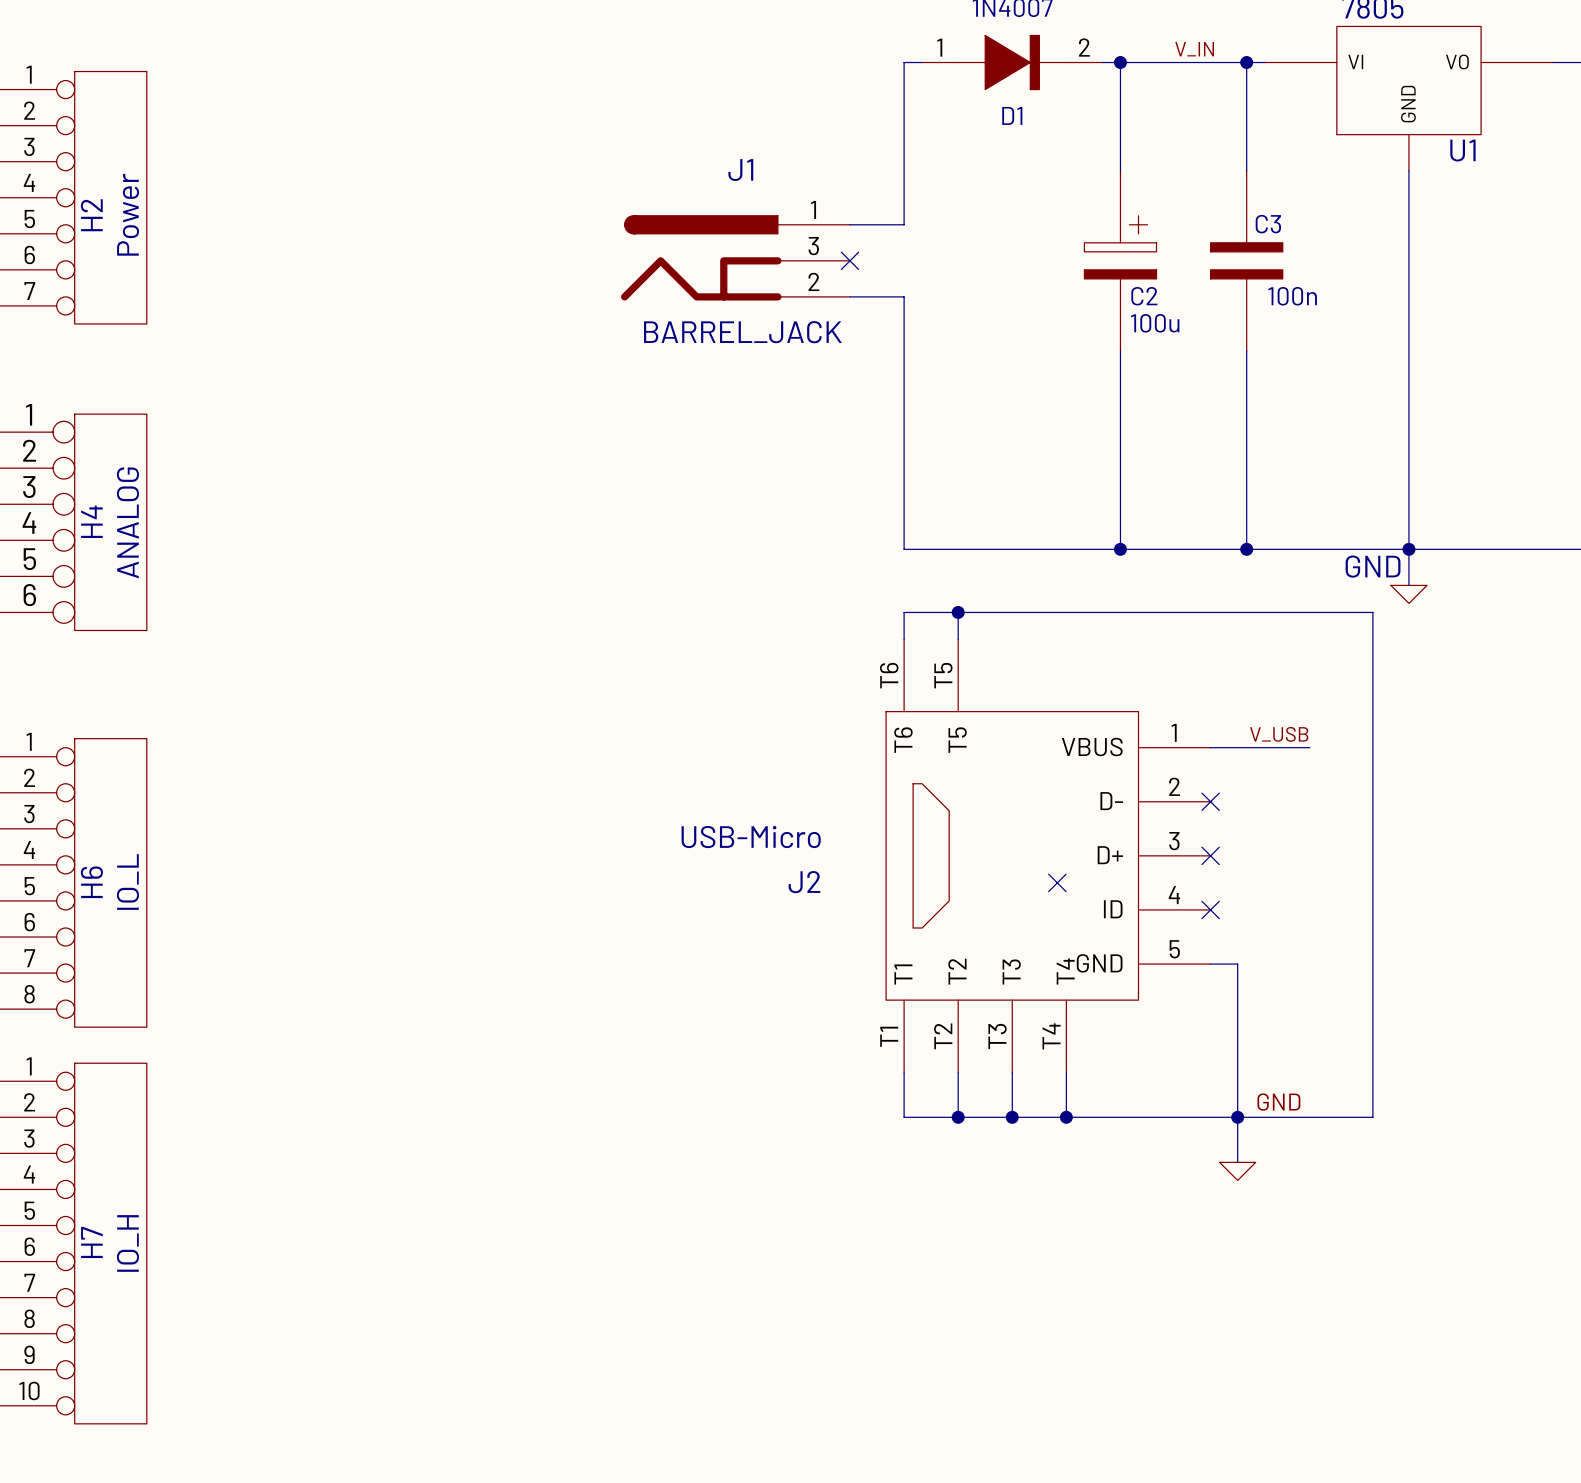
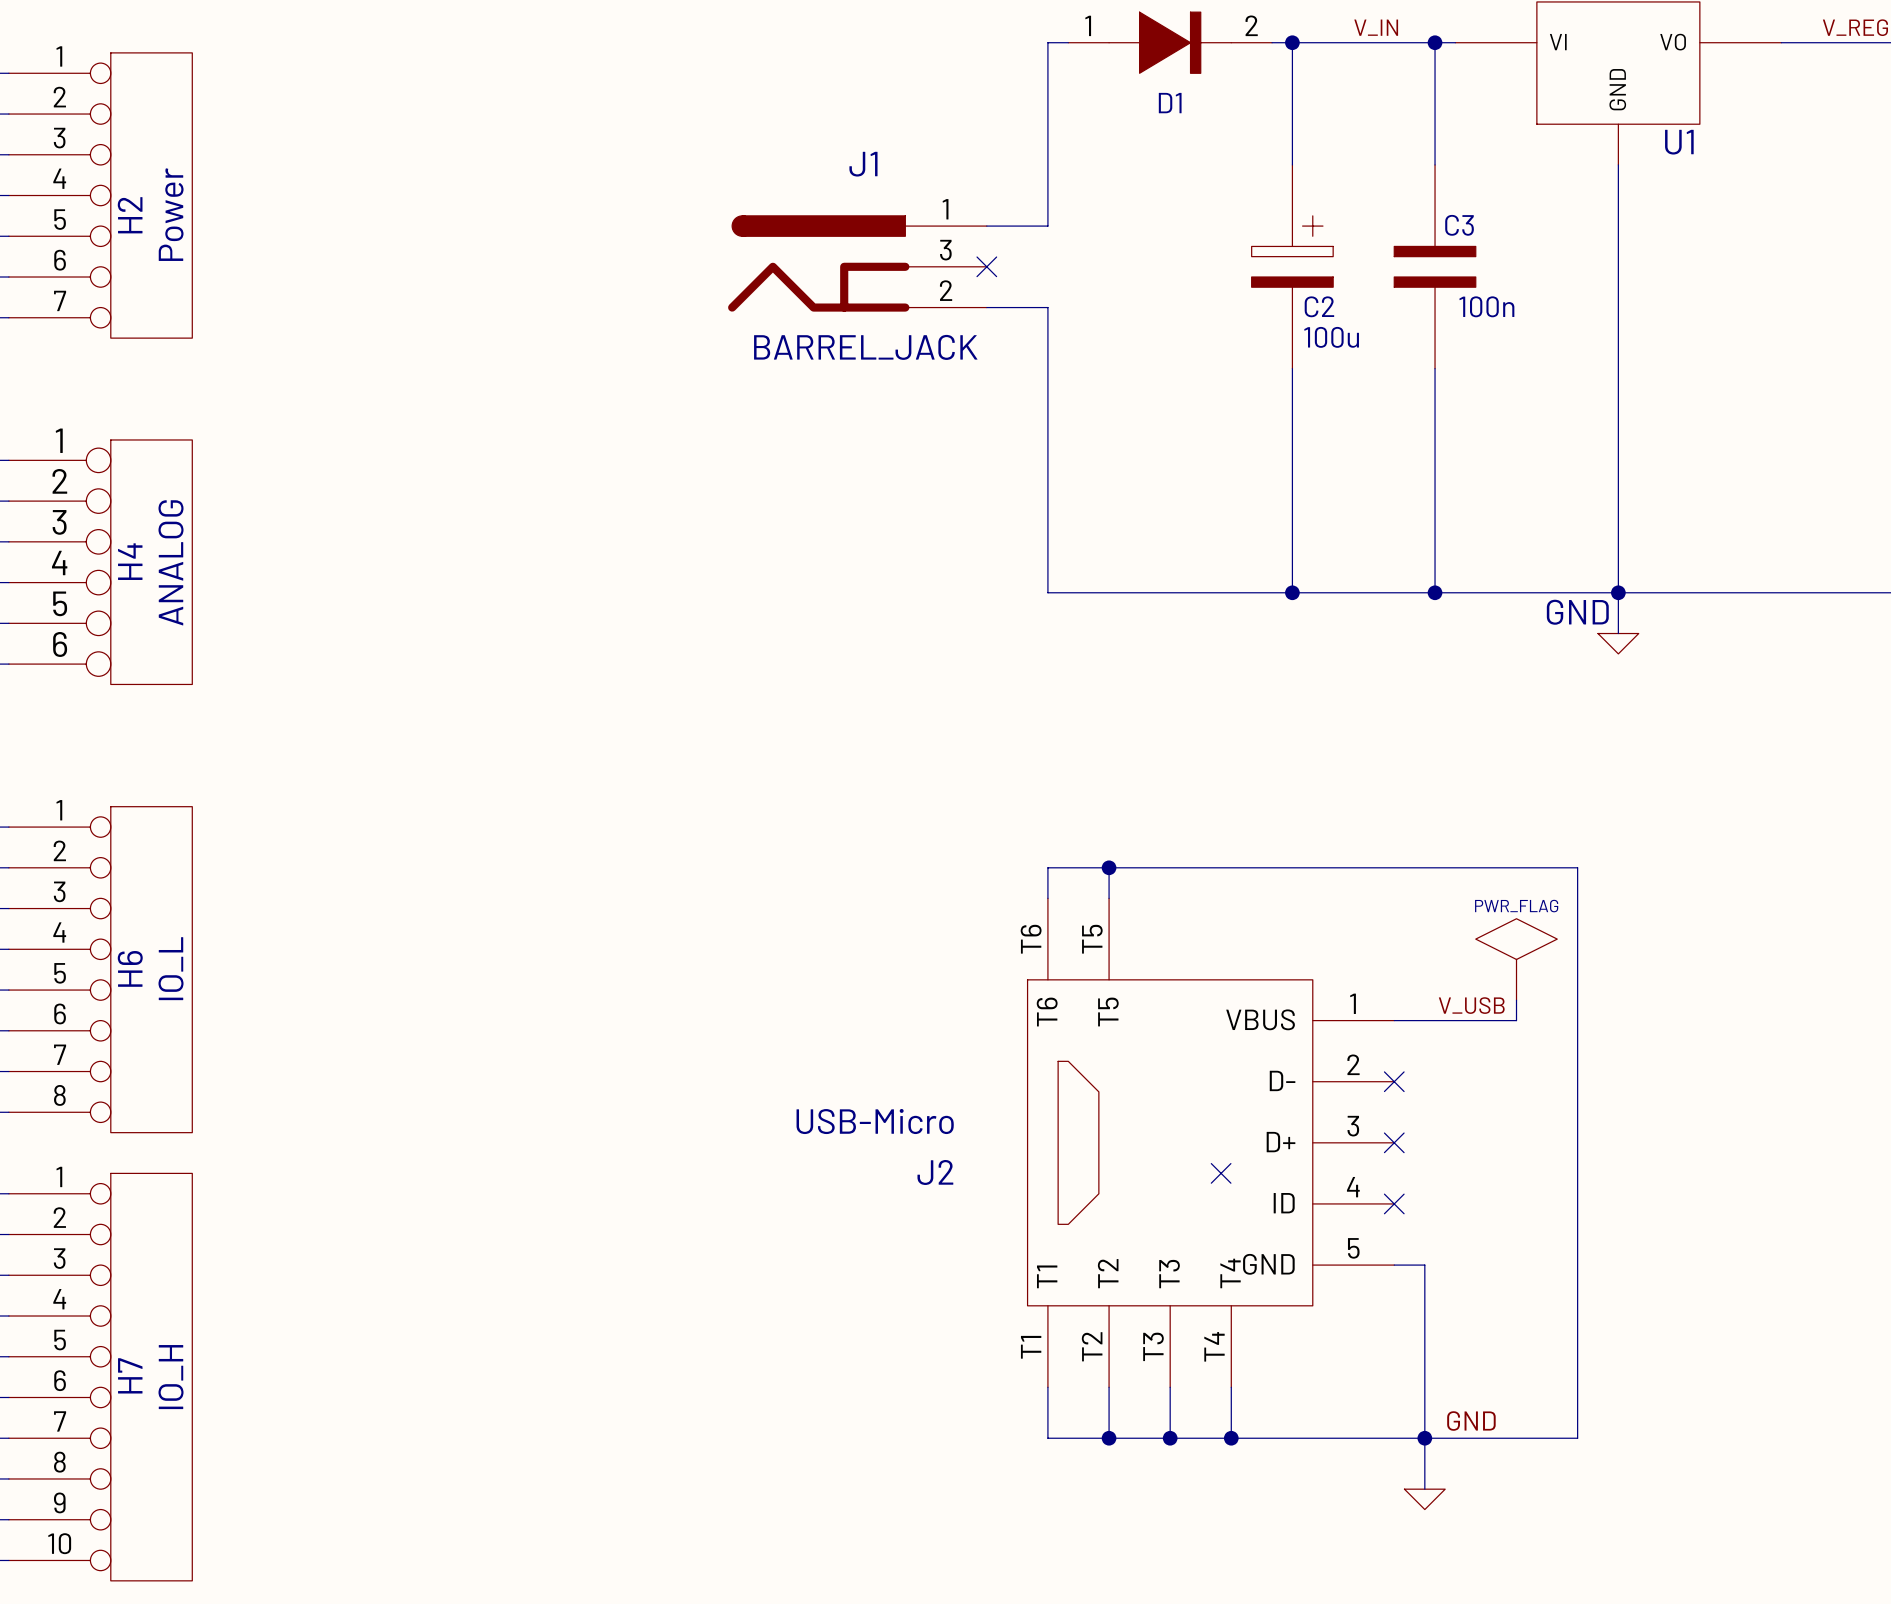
wire: (958, 612) (958, 639) -> (1109, 867) (1109, 898)
junction: (958, 612) -> none
wire: (904, 639) (904, 612) (1372, 612) (1372, 792) -> (1047, 898) (1047, 867) (1577, 867)
label position: V_USB (1279, 734) -> V_USB (1471, 1005)
wire: (1210, 747) (1309, 747) -> none
junction: none -> (1109, 867)
no-connect mark: (1210, 801) -> none
J2 position: (1048, 855) -> (1210, 1142)
no-connect mark: (1210, 855) -> none
power symbol: none -> PWR_FLAG (1516, 959)
no-connect mark: (1057, 882) -> none
no-connect mark: (1210, 909) -> none
wire: none -> (1516, 1000) (1516, 1020) (1394, 1020)
wire: (1210, 964) (1237, 964) (1237, 1144) -> (1394, 1265) (1424, 1265)
no-connect mark: none -> (1394, 1081)
no-connect mark: none -> (1394, 1142)
no-connect mark: none -> (1221, 1173)
wire: (904, 1072) (904, 1117) (1372, 1117) -> (1047, 1387) (1047, 1438) (1577, 1438) (1577, 1234)
wire: (958, 1072) (958, 1117) -> (1109, 1387) (1109, 1438)
wire: (1012, 1072) (1012, 1117) -> (1170, 1387) (1170, 1438)
wire: (1066, 1072) (1066, 1117) -> (1231, 1387) (1231, 1438)
no-connect mark: none -> (1394, 1203)
label position: GND (1278, 1102) -> GND (1471, 1421)
junction: (958, 1117) -> none
junction: (1012, 1117) -> none
junction: (1066, 1117) -> none
junction: (1237, 1117) -> none
wire: none -> (1424, 1285) (1424, 1489)
power symbol position: (1237, 1171) -> (1424, 1499)
junction: none -> (1109, 1438)
junction: none -> (1170, 1438)
junction: none -> (1231, 1438)
junction: none -> (1424, 1438)

